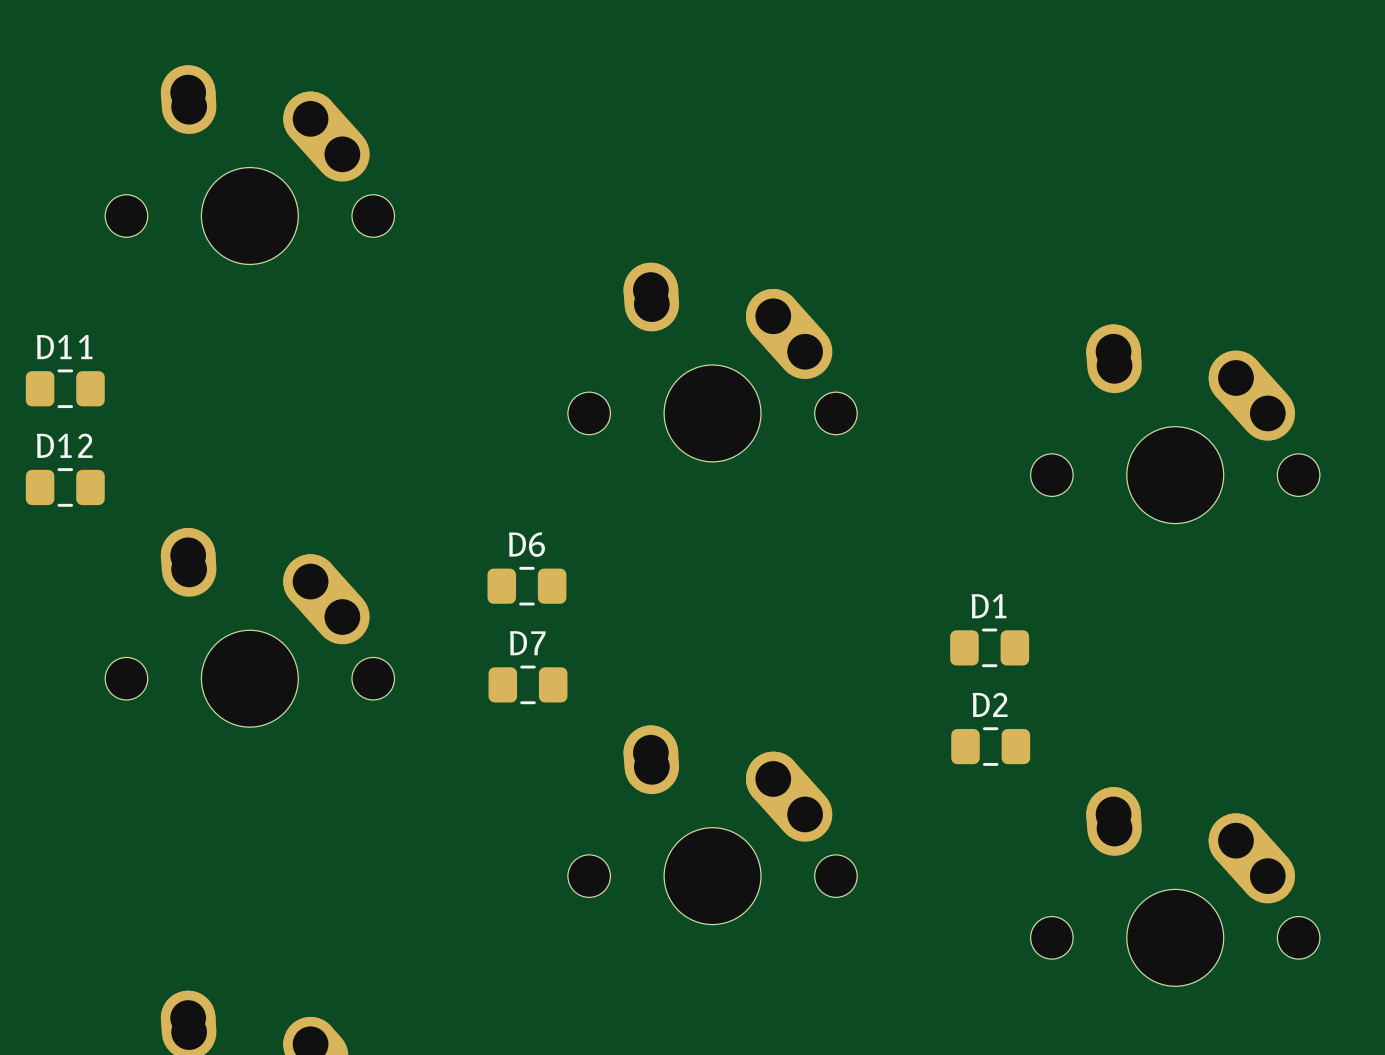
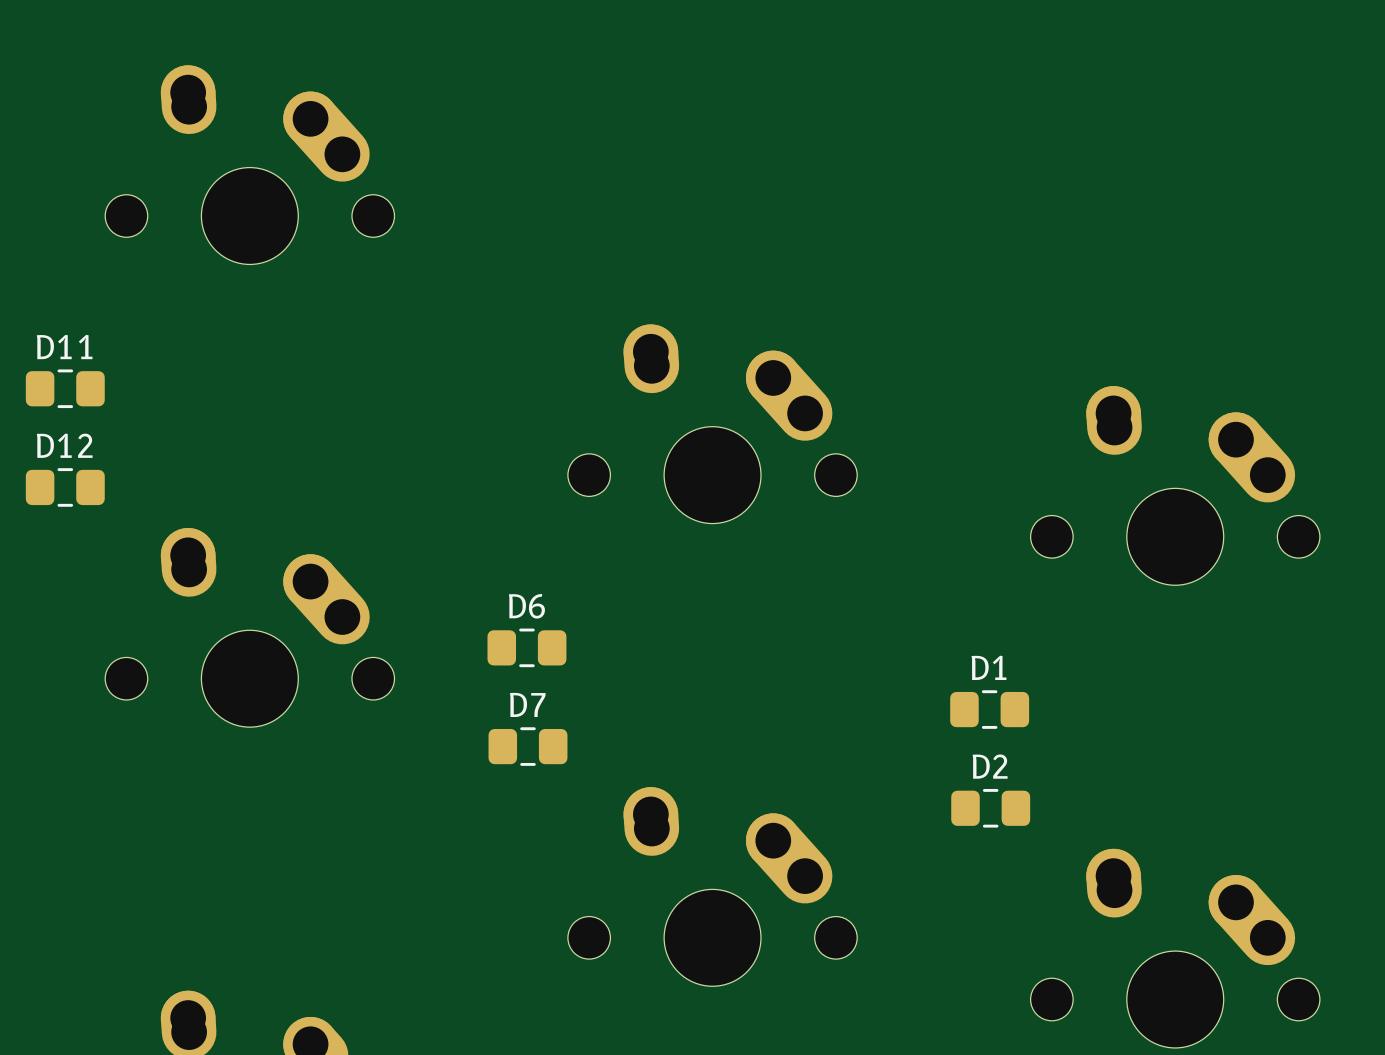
part position: (712, 362) -> (712, 423)
part position: (1175, 423) -> (1175, 485)
D6 position: (526, 586) -> (526, 647)
D1 position: (989, 647) -> (989, 709)
D7 position: (527, 684) -> (527, 746)
D2 position: (990, 746) -> (990, 808)
part position: (712, 824) -> (712, 886)
part position: (1175, 886) -> (1175, 948)

